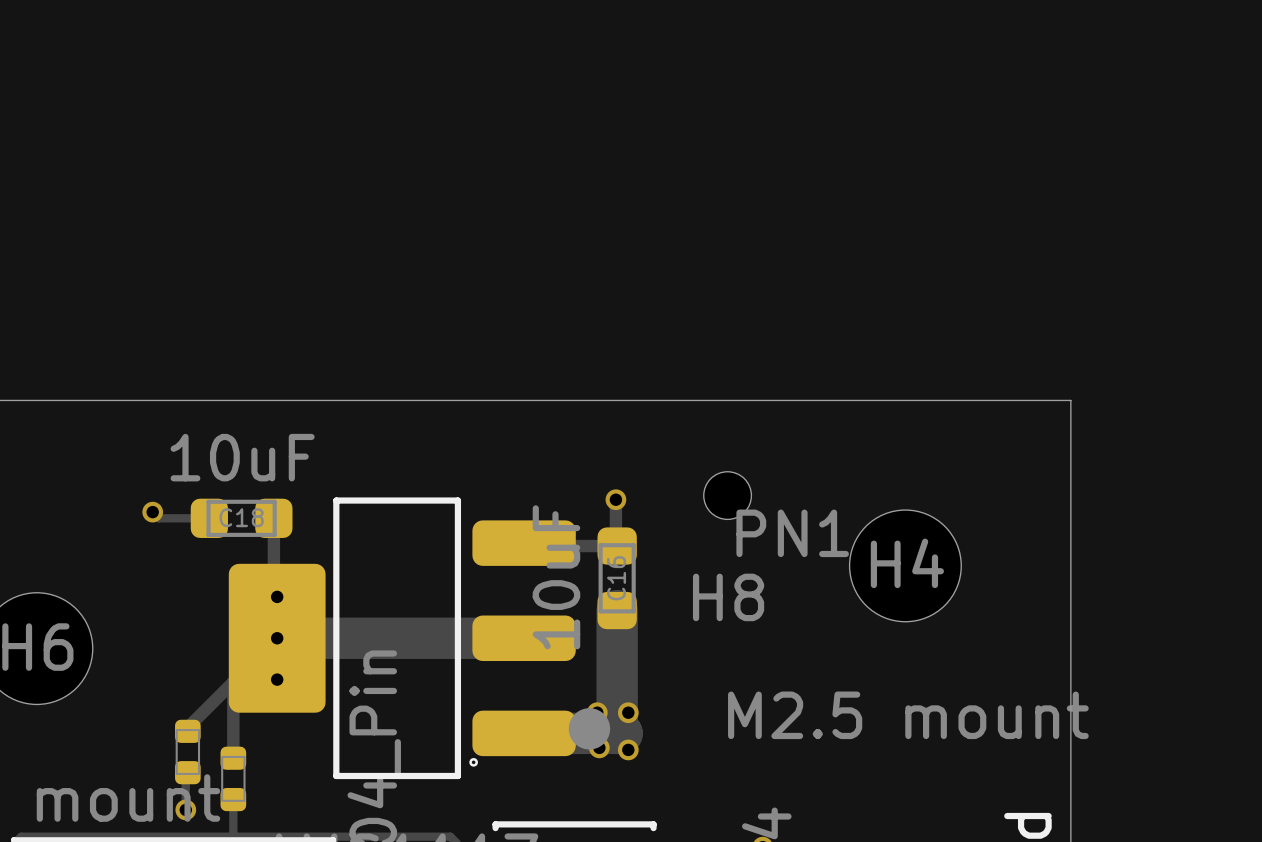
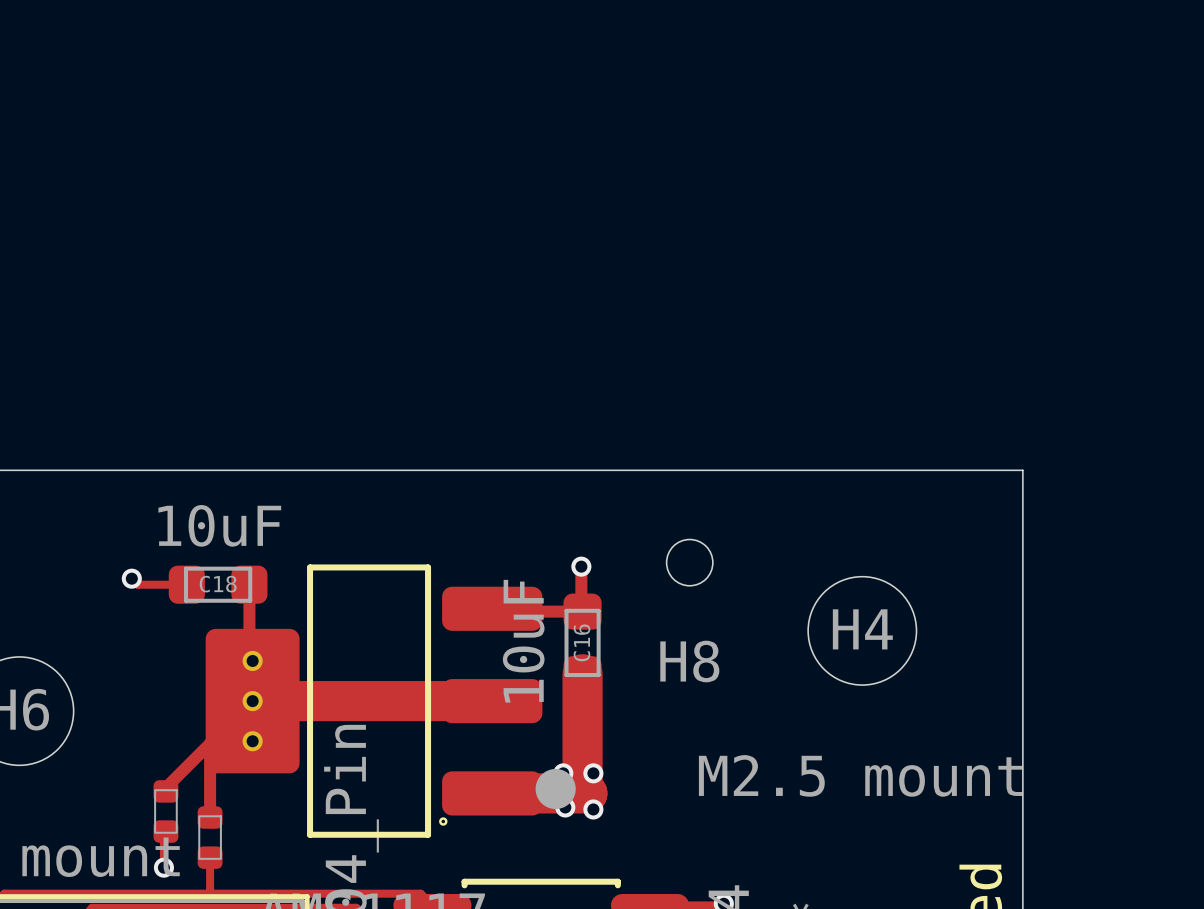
PN1: (792, 533) -> none

